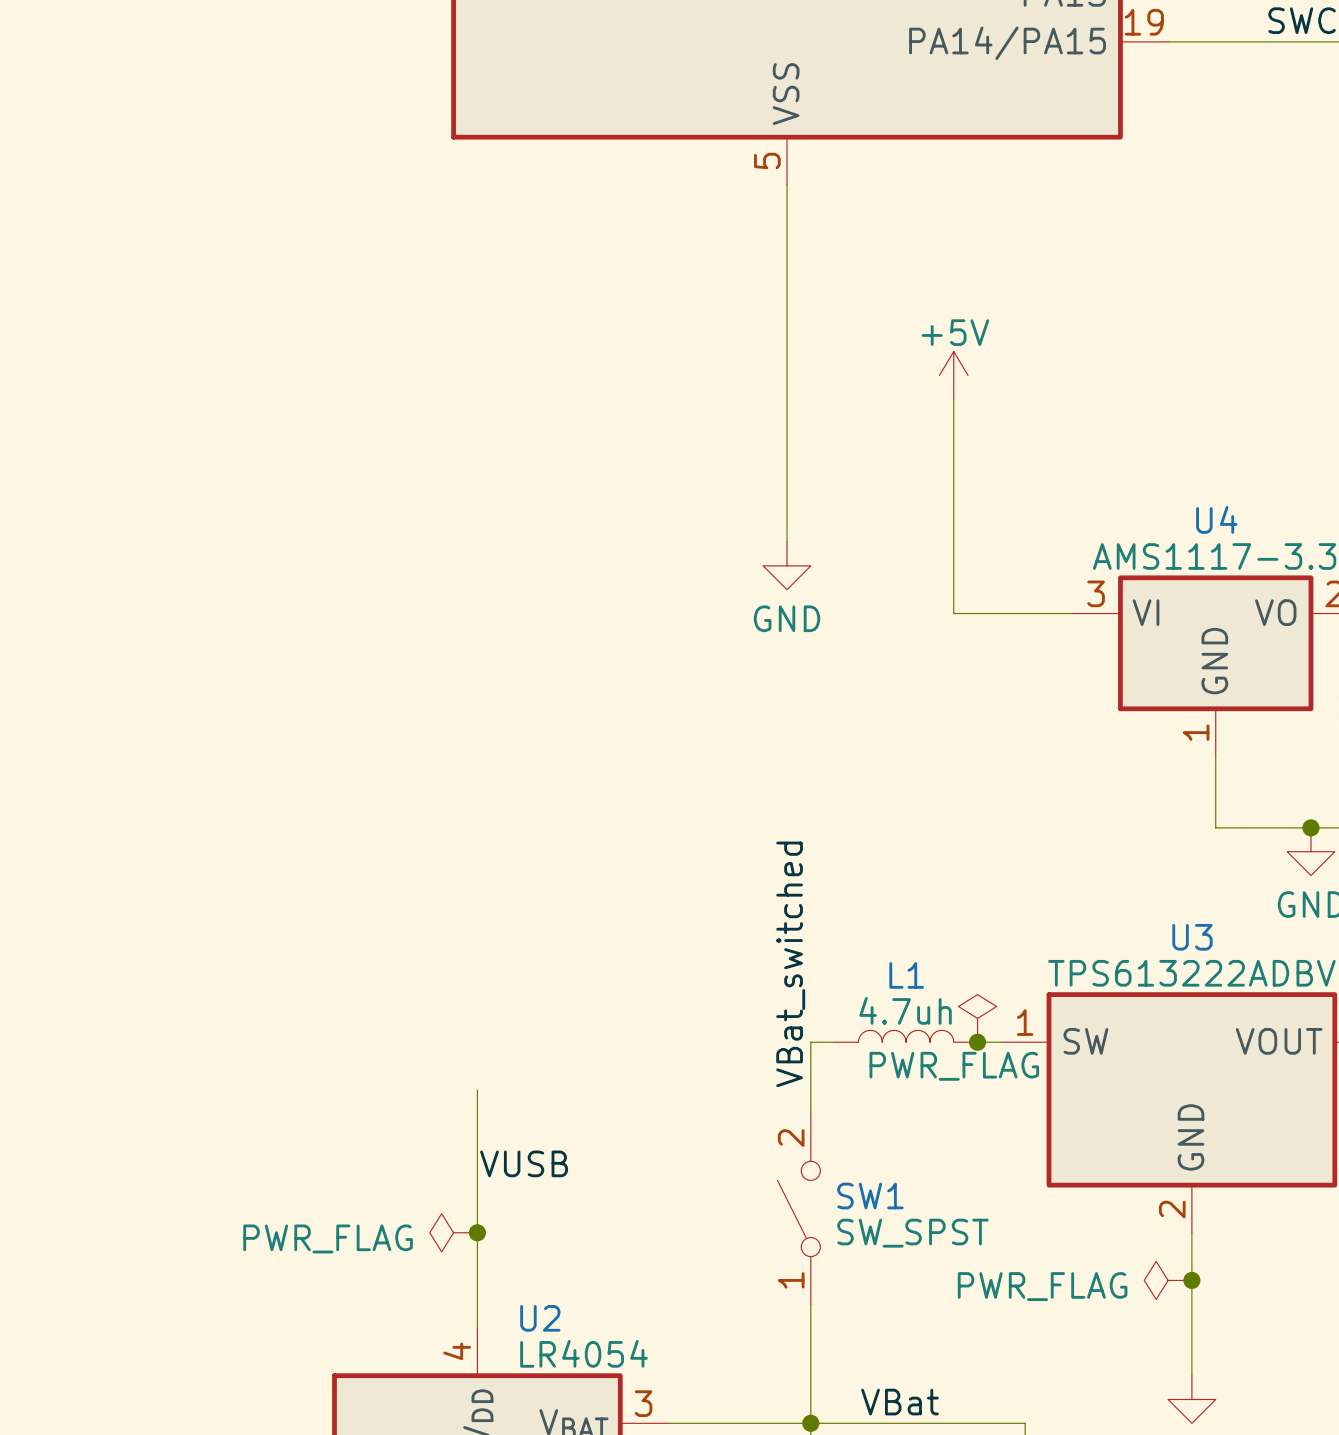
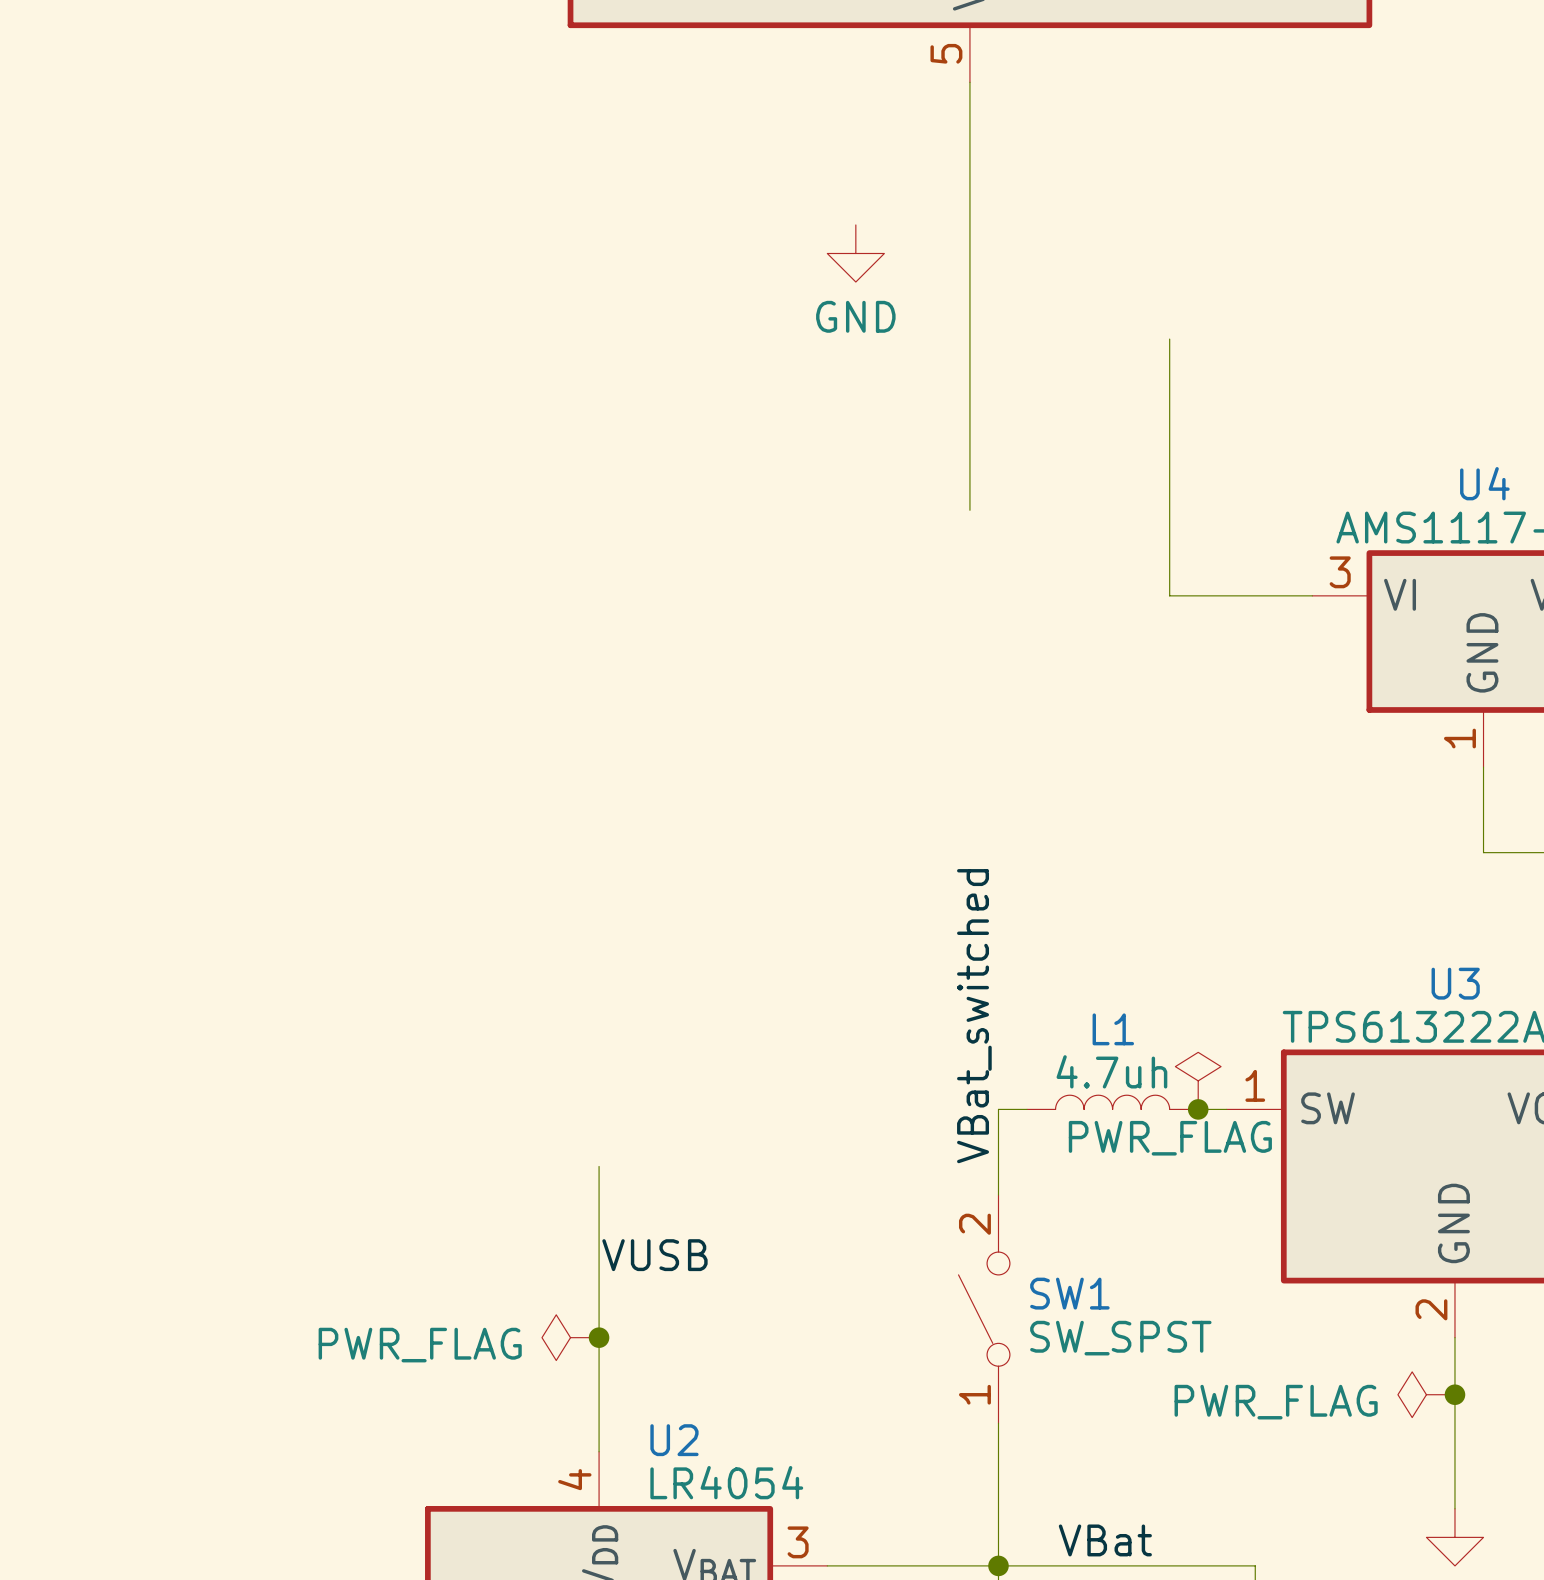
power symbol: +5V (953, 375) -> none
power symbol position: GND (787, 565) -> GND (855, 253)

